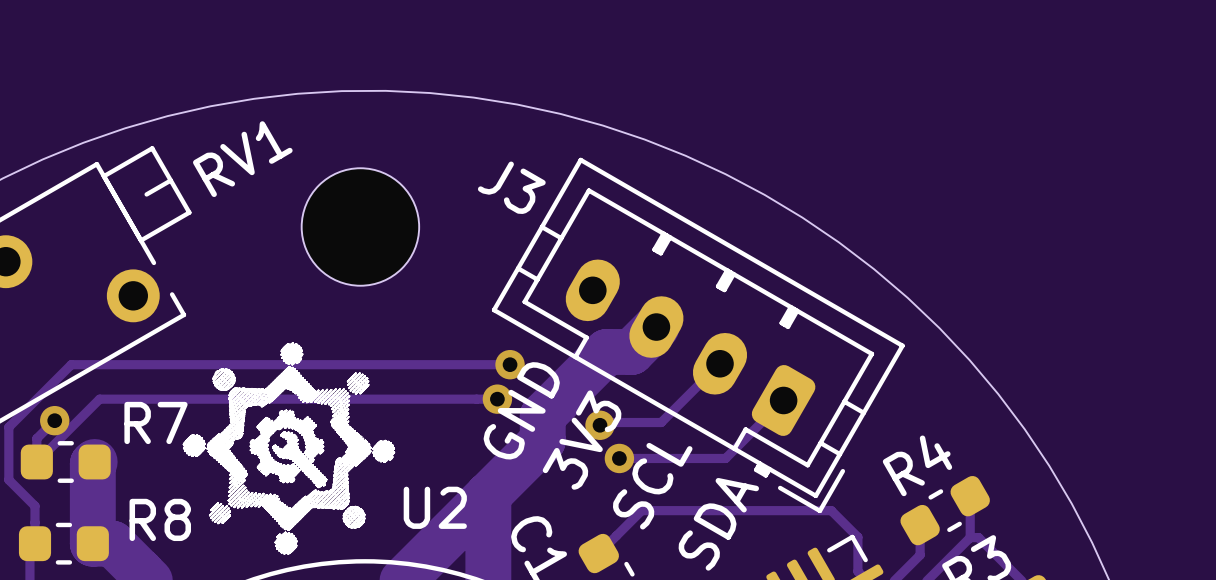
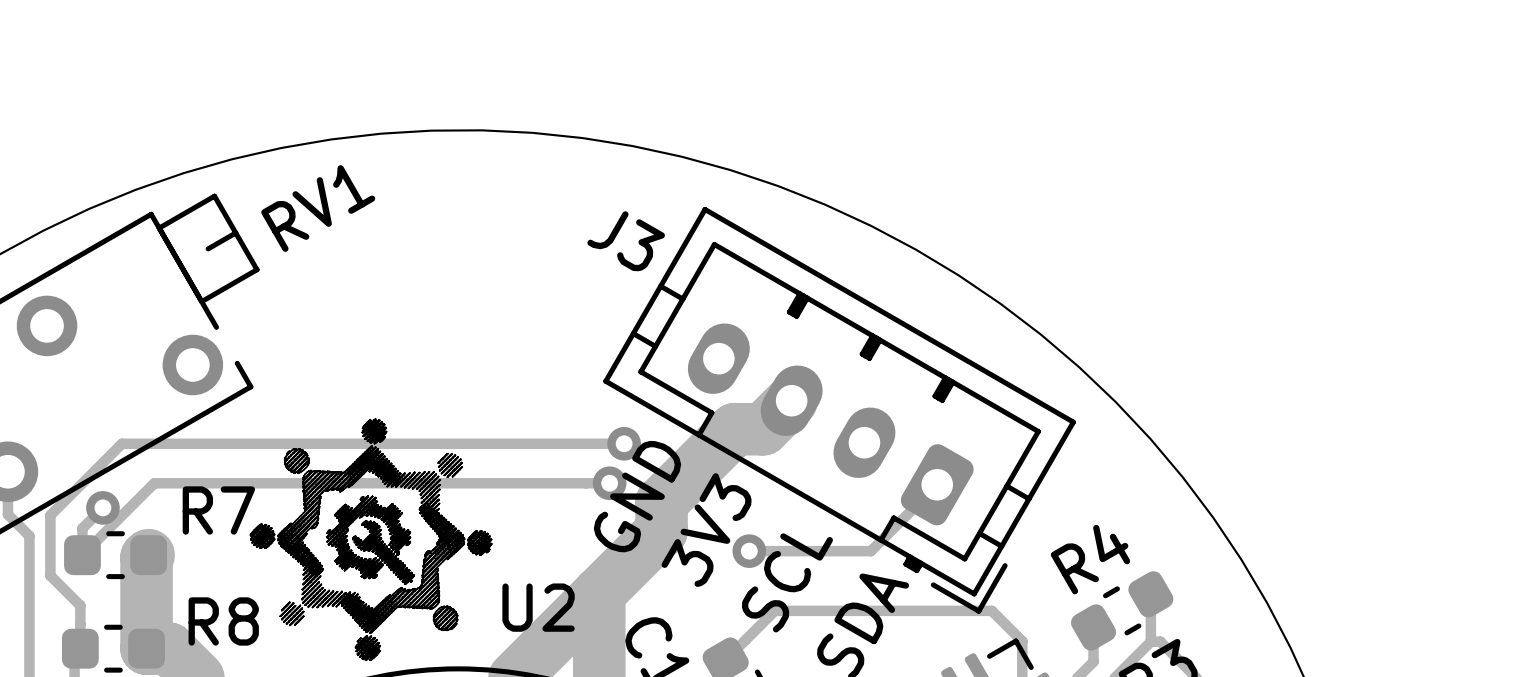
part: (360, 226) -> none
track: (720, 363) (661, 422) (602, 422) (600, 425) -> none
via: (600, 425) -> none

